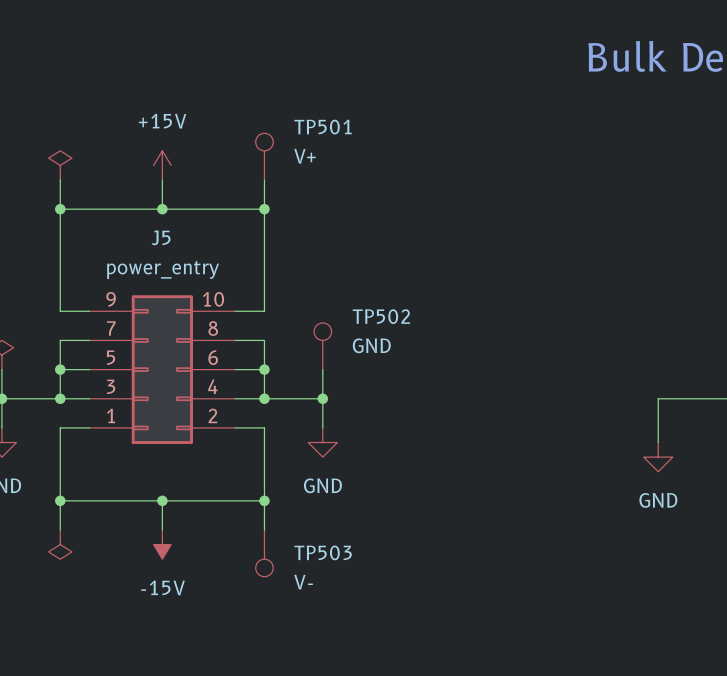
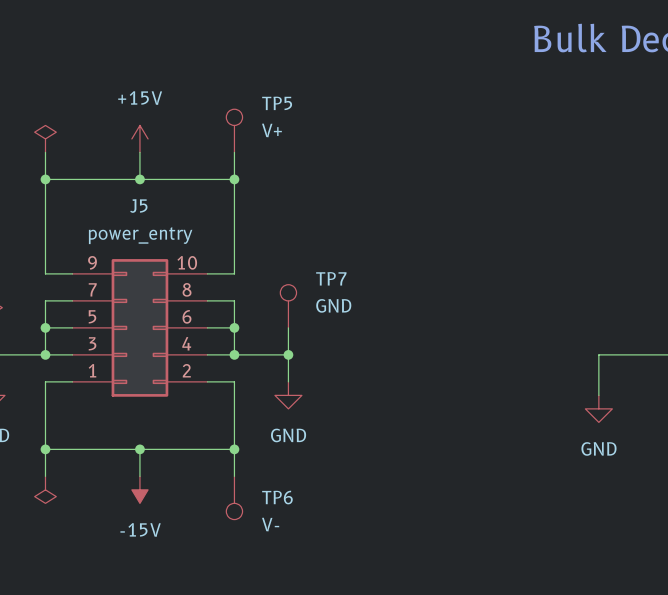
TP501 name: TP501 (323, 127) -> TP5 (277, 103)
TP502 name: TP502 (381, 316) -> TP7 (331, 278)
TP503 name: TP503 (323, 552) -> TP6 (277, 497)

